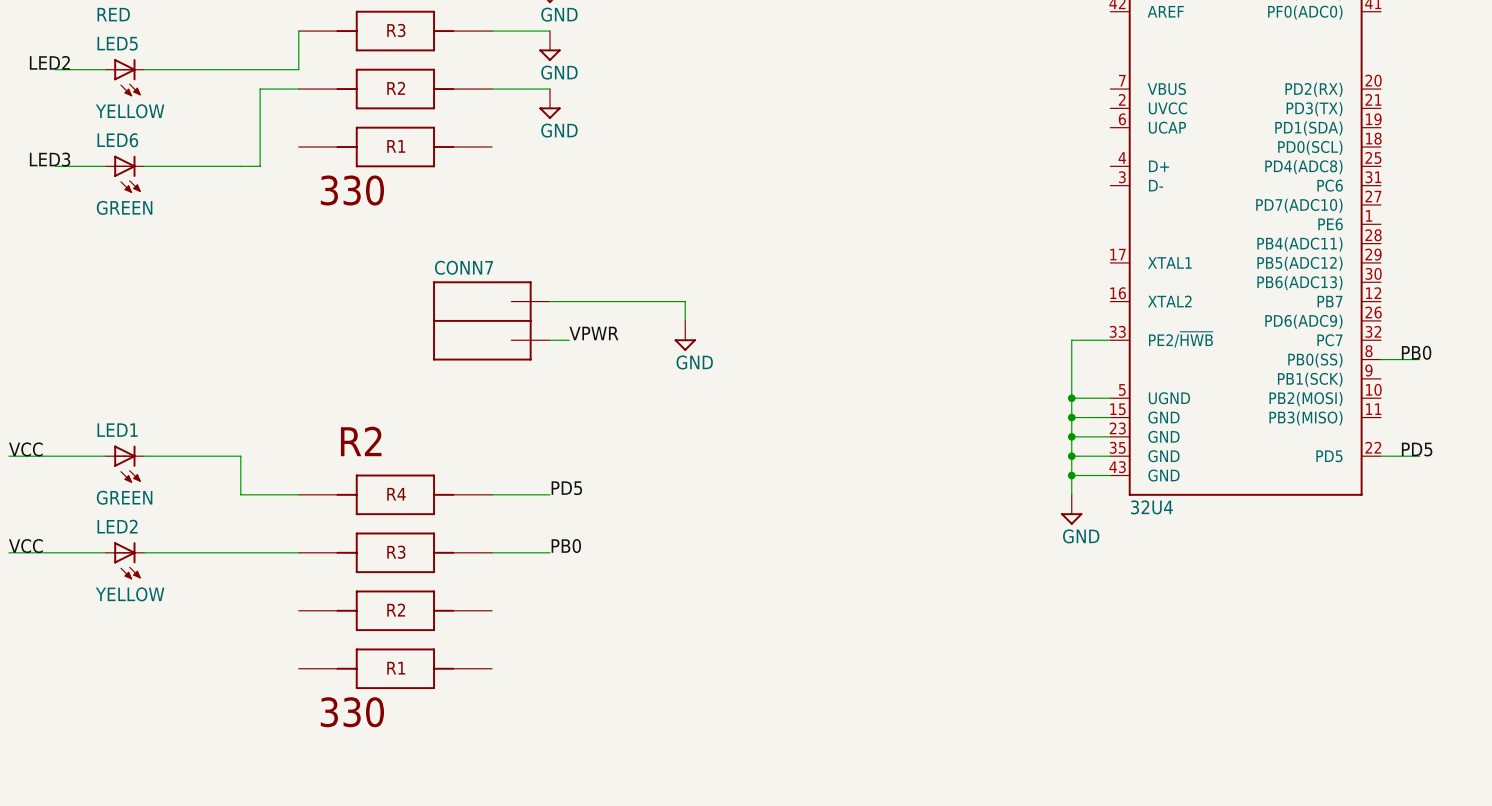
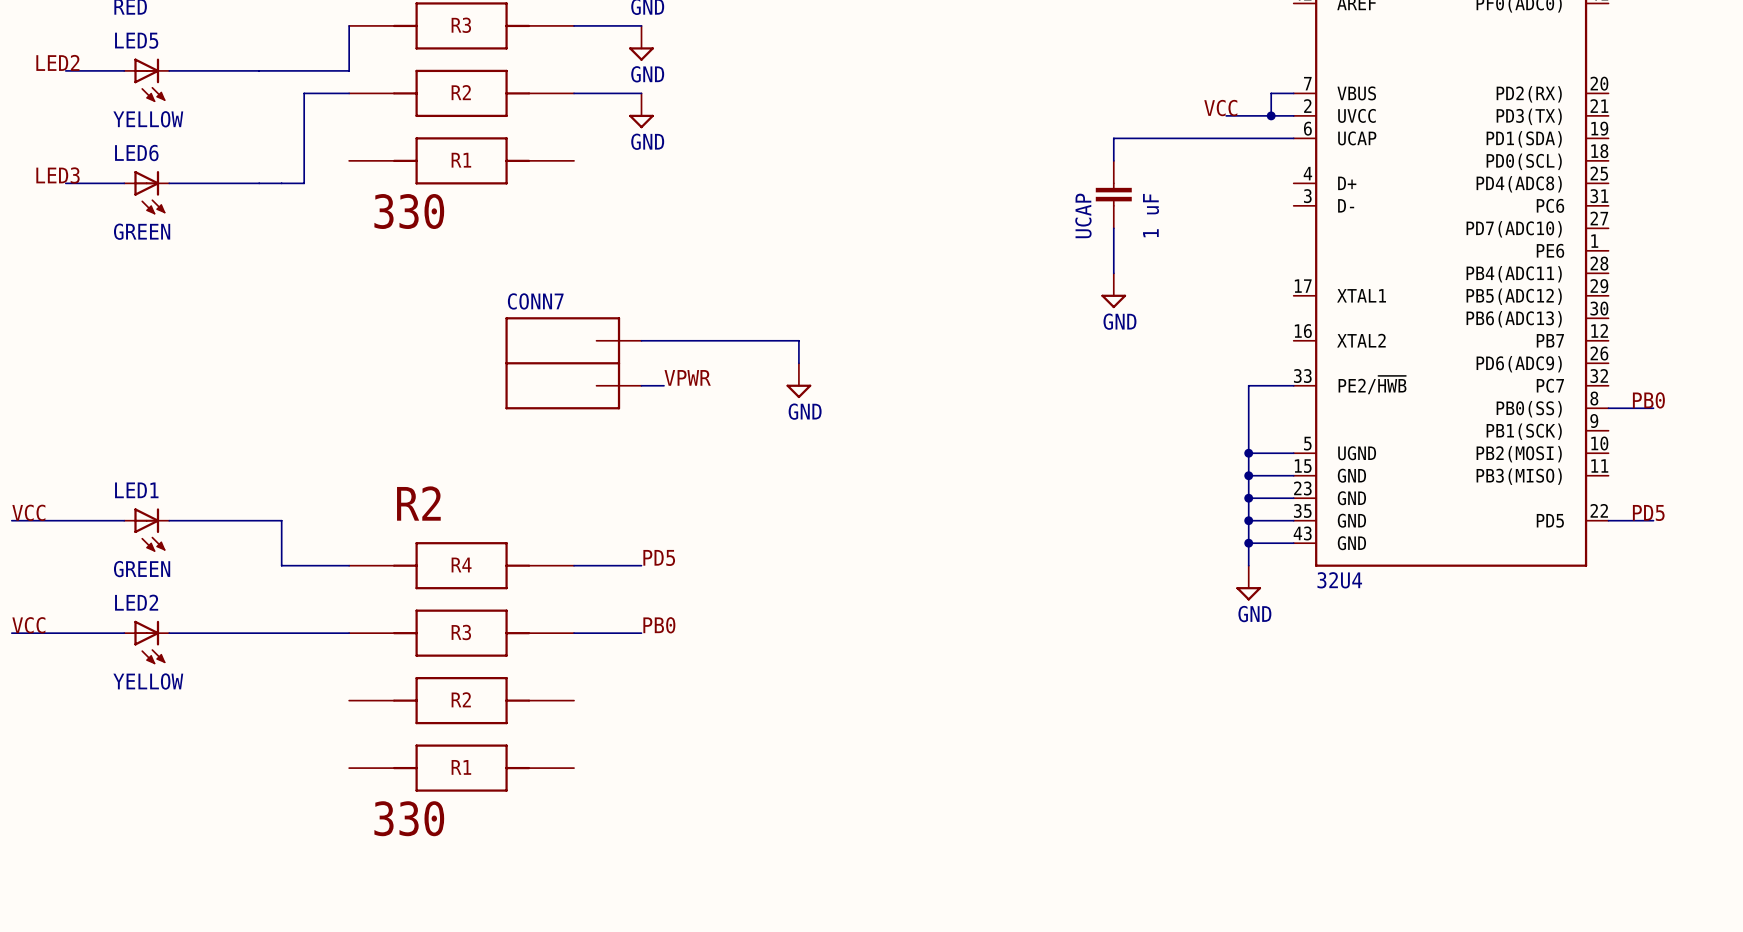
wire: none -> (1293, 93) (1271, 93) (1271, 115)
label: none -> VCC (1220, 108)
wire: none -> (1226, 115) (1293, 115)
junction: none -> (1271, 115)
wire: none -> (1293, 138) (1113, 138) (1113, 160)
UCAP: none -> 1 uF (1113, 194)
wire: none -> (1113, 228) (1113, 273)
power symbol: none -> GND (1113, 290)

